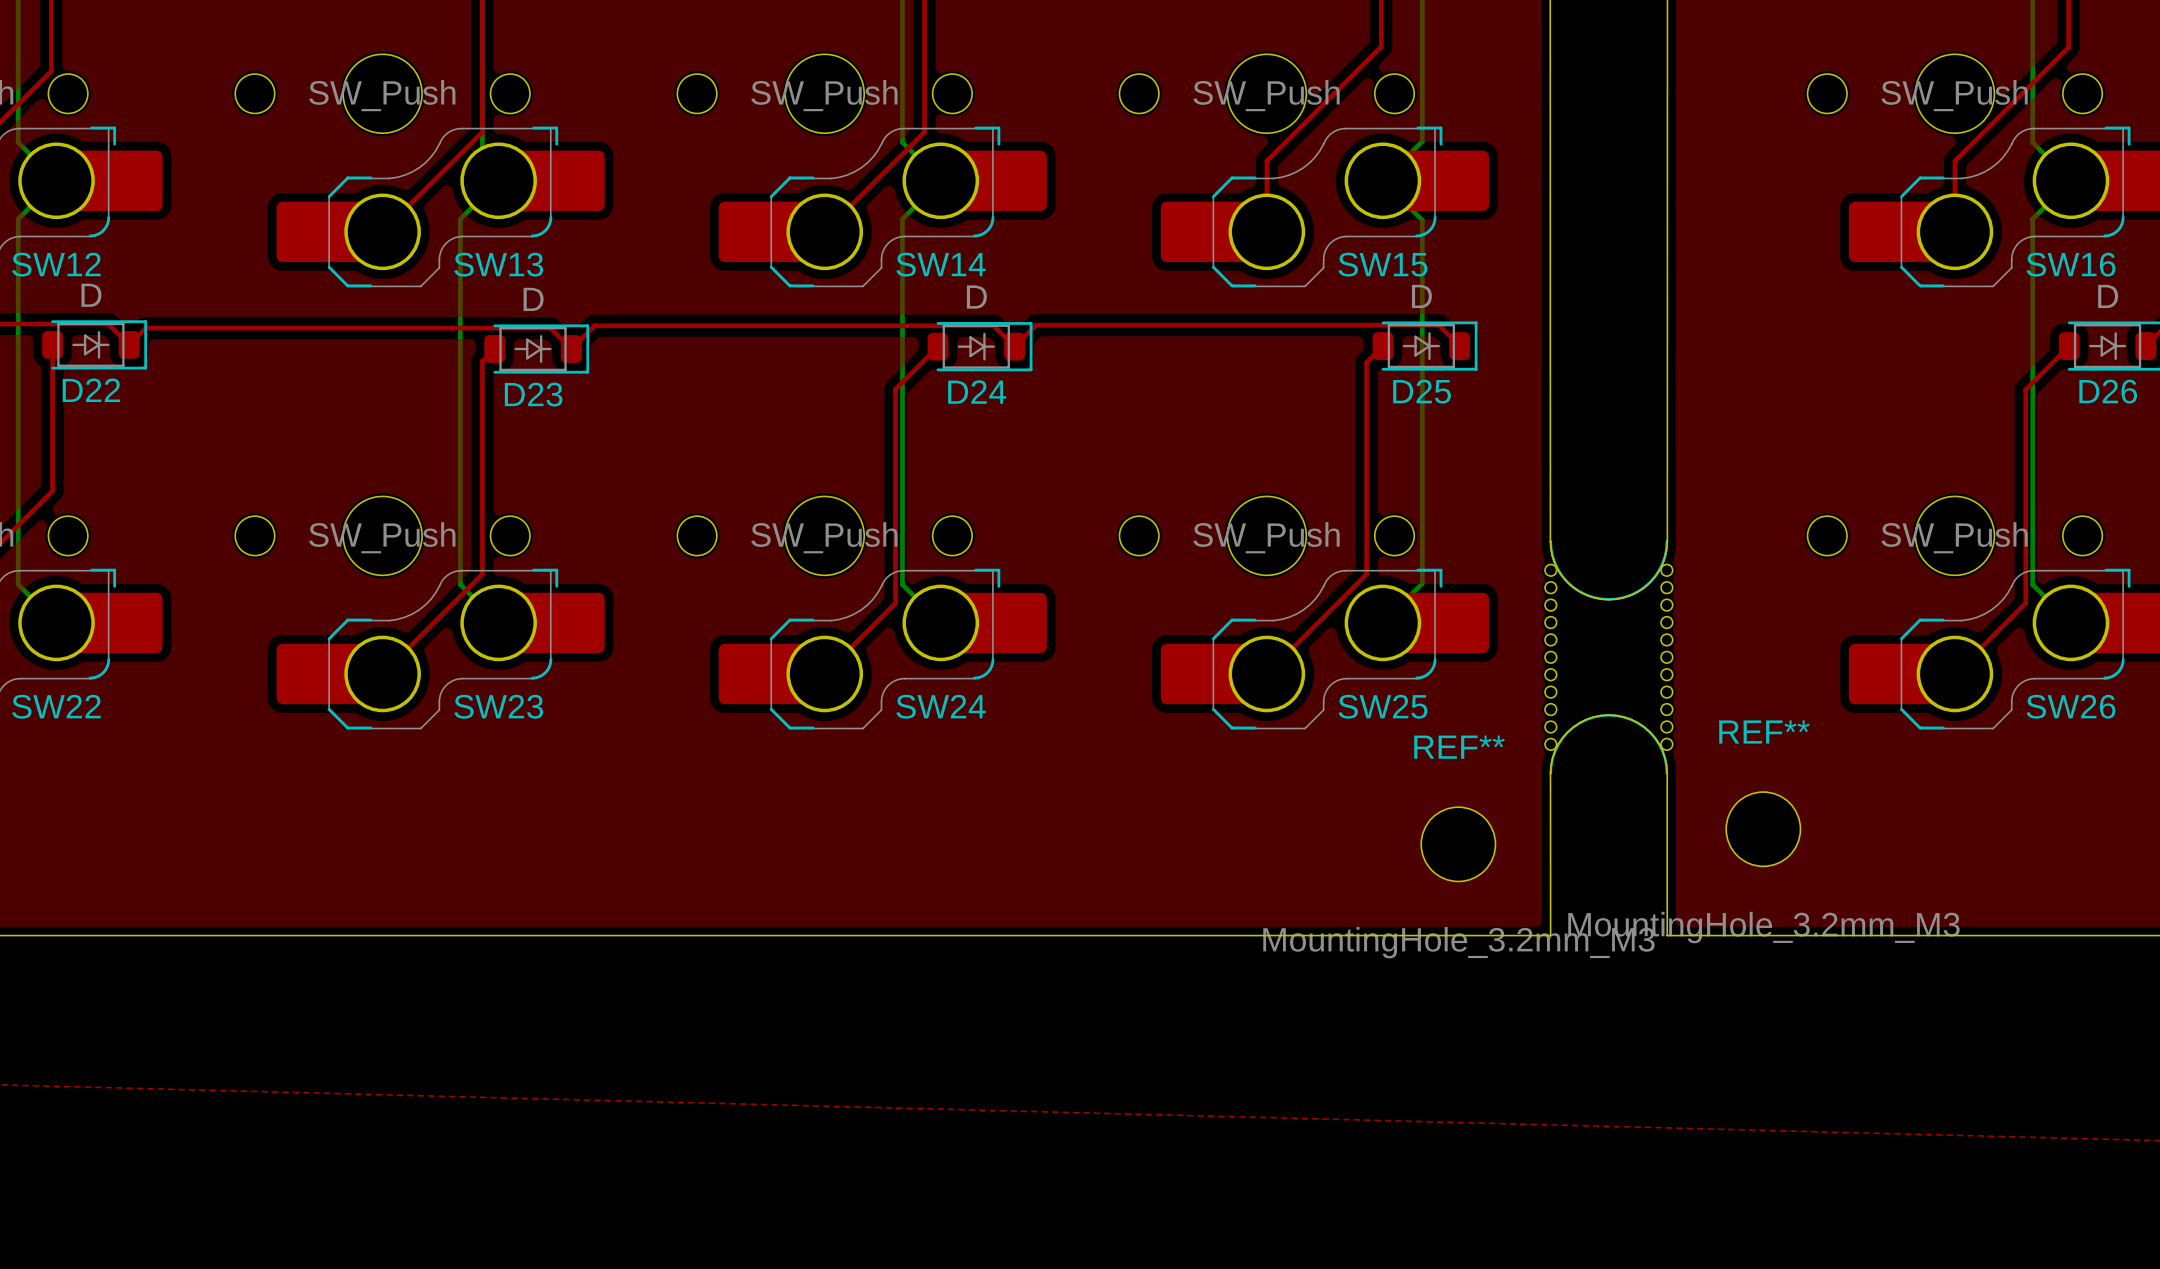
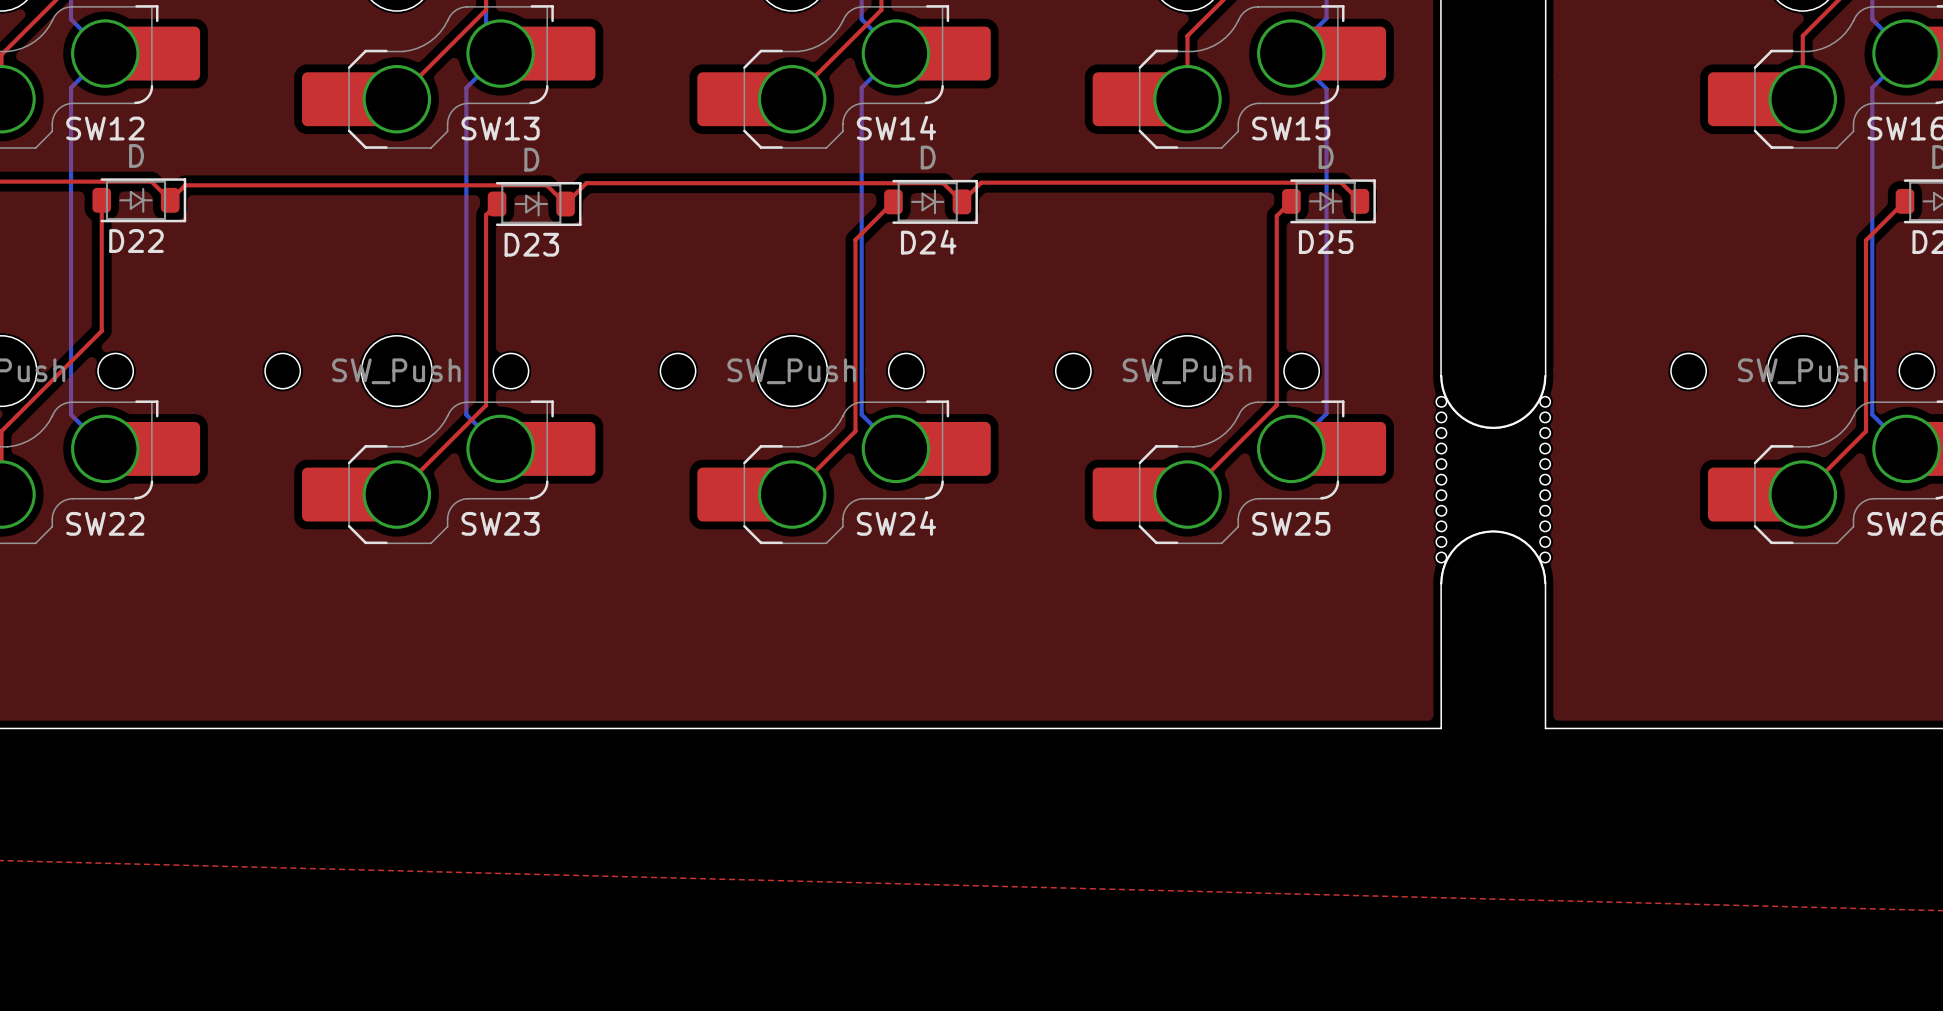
REF**: MountingHole_3.2mm_M3 (1763, 829) -> none
REF**: MountingHole_3.2mm_M3 (1458, 844) -> none

